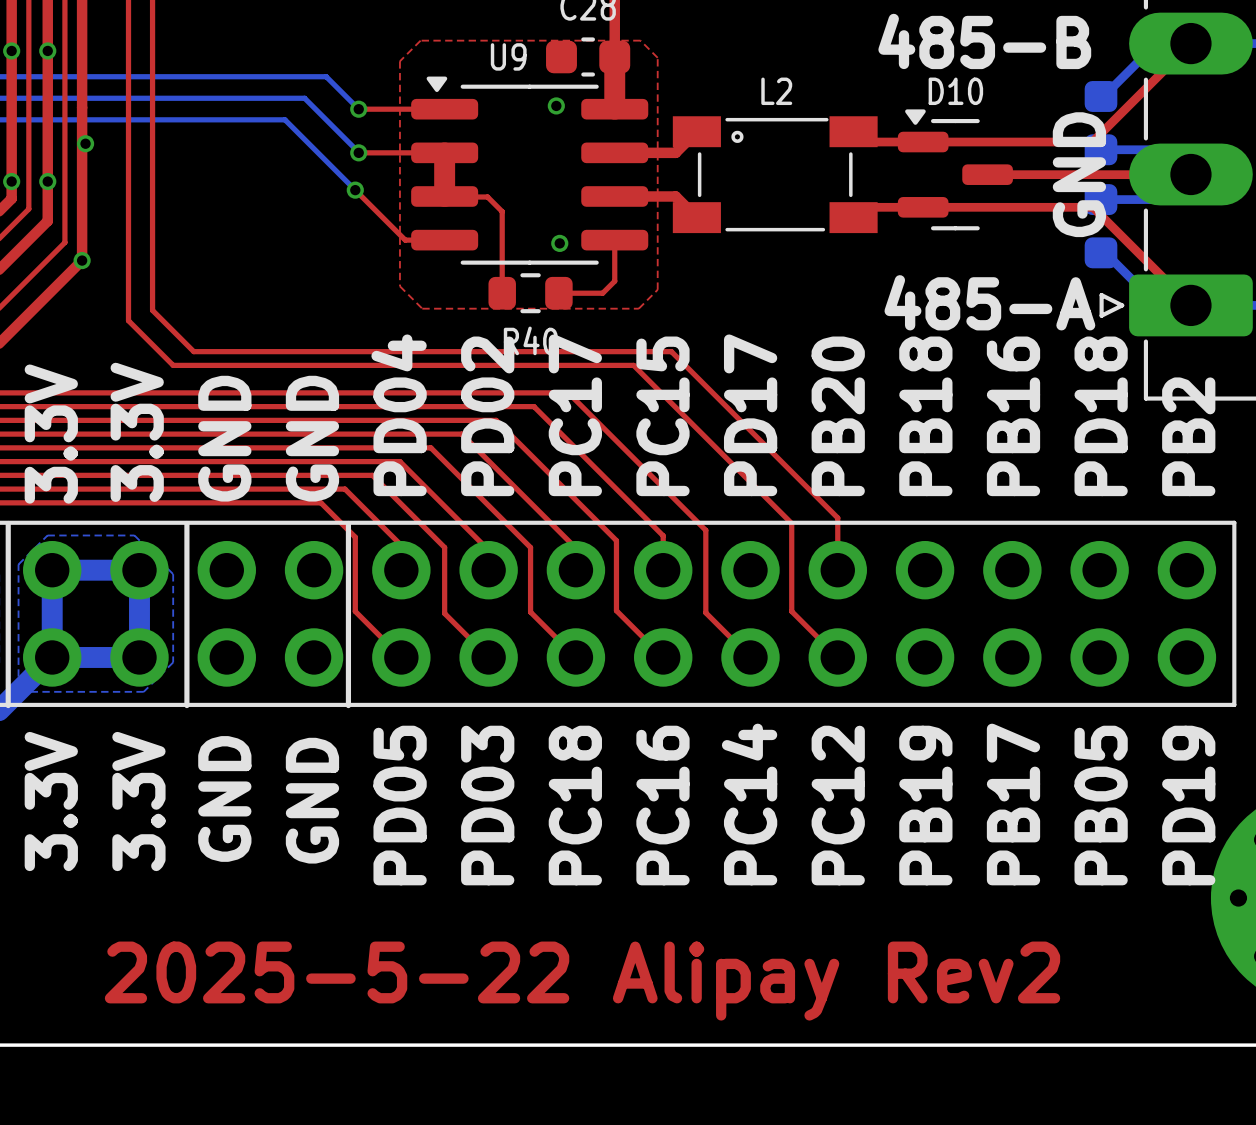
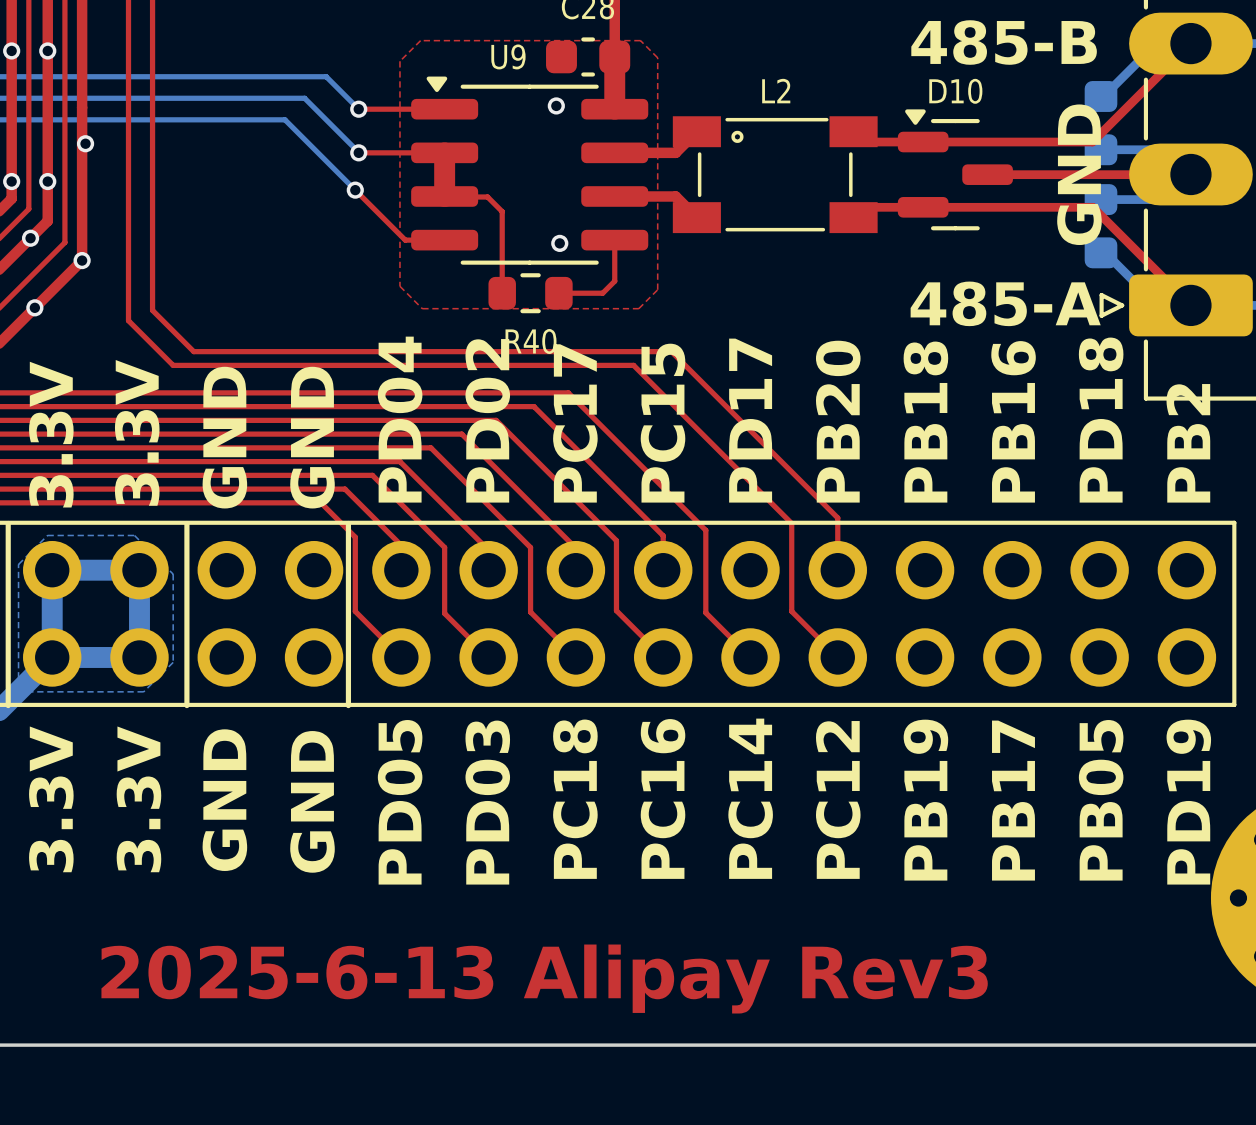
via: none -> (30, 238)
via: none -> (34, 307)
text: 2025-5-22 Alipay Rev2 (582, 981) -> 2025-6-13 Alipay Rev3 (544, 979)

